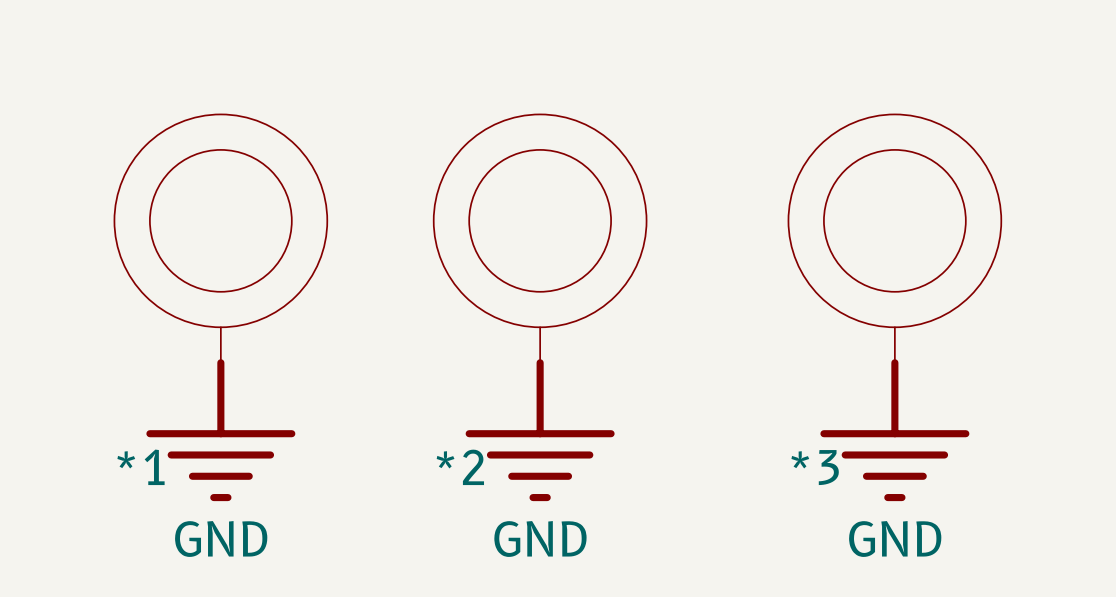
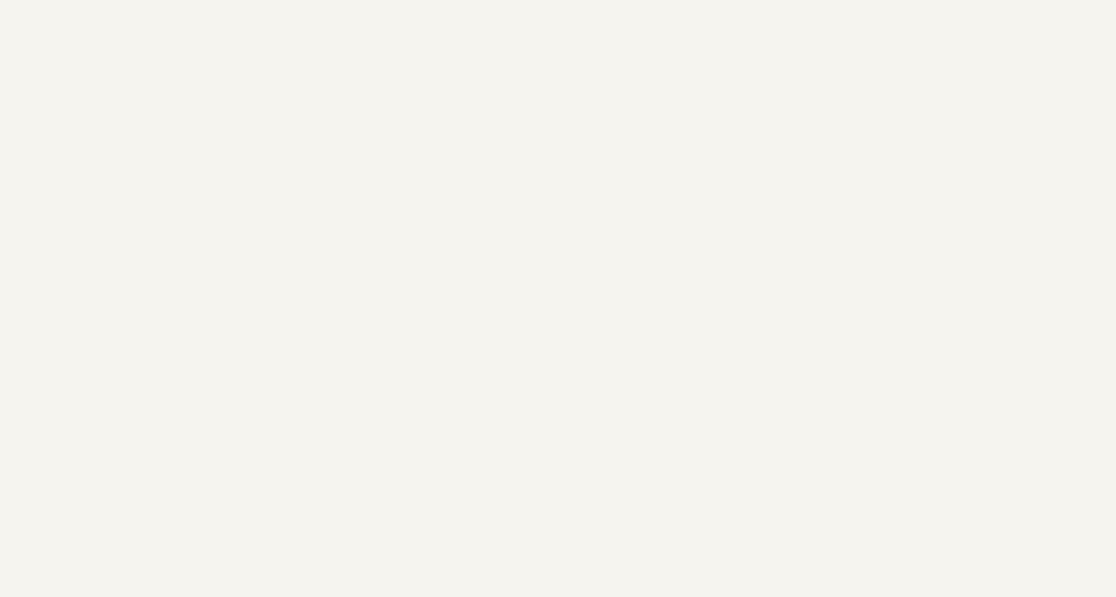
*1: (220, 238) -> none
*2: (540, 238) -> none
*3: (894, 238) -> none
power symbol: GND (220, 430) -> none
power symbol: GND (540, 430) -> none
power symbol: GND (894, 430) -> none

